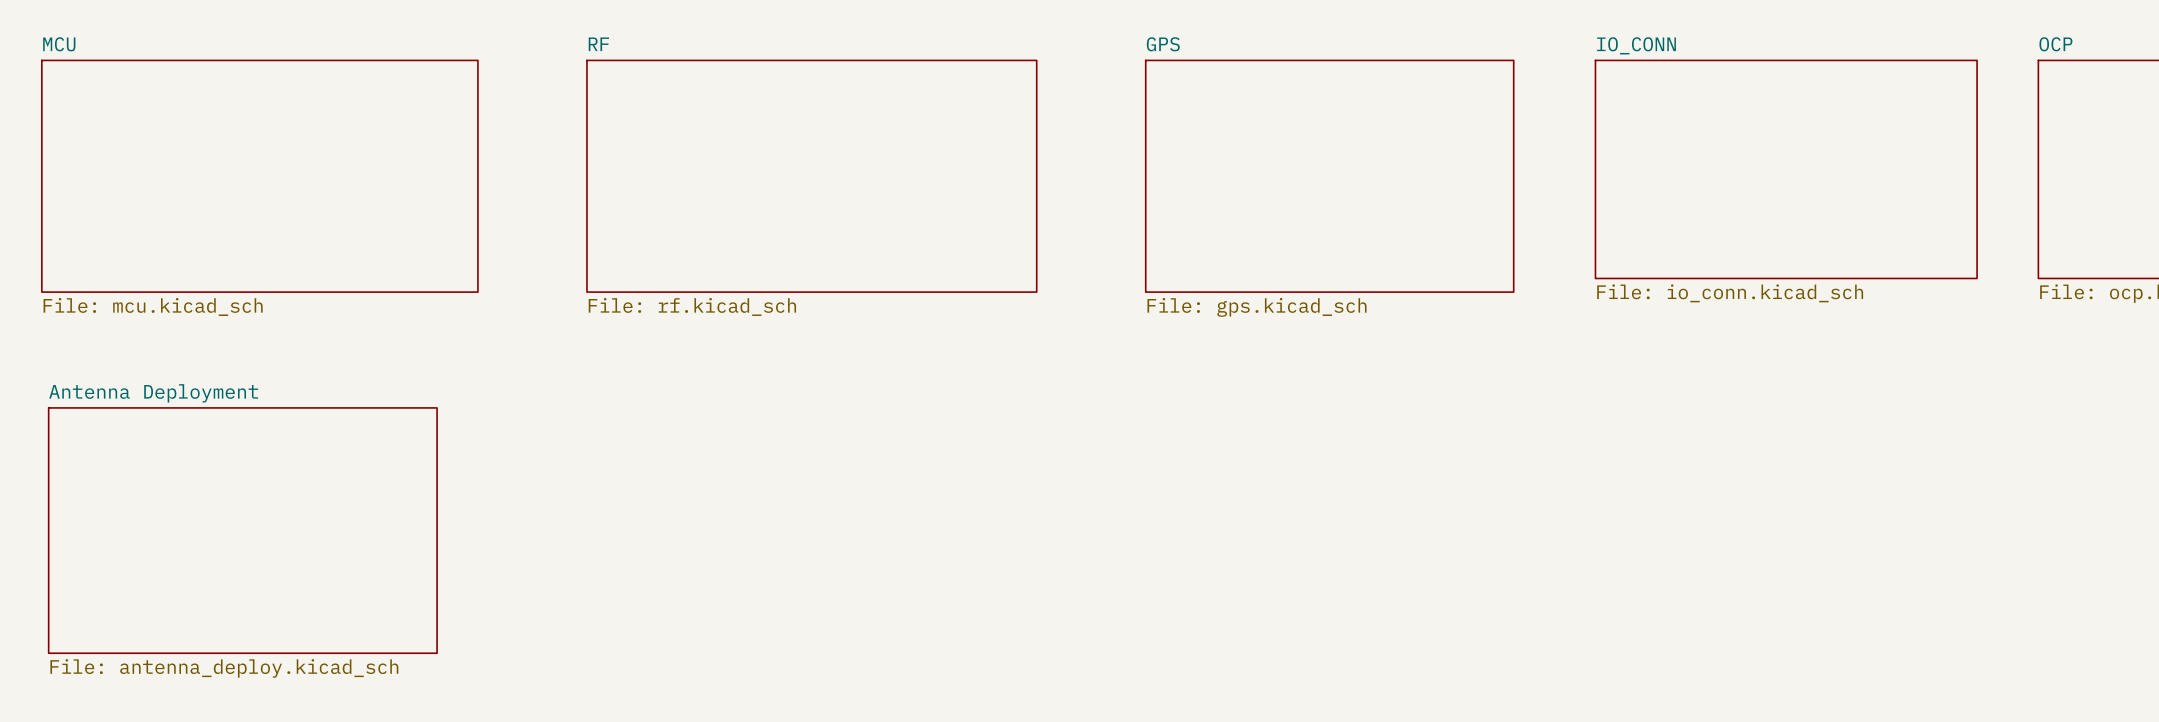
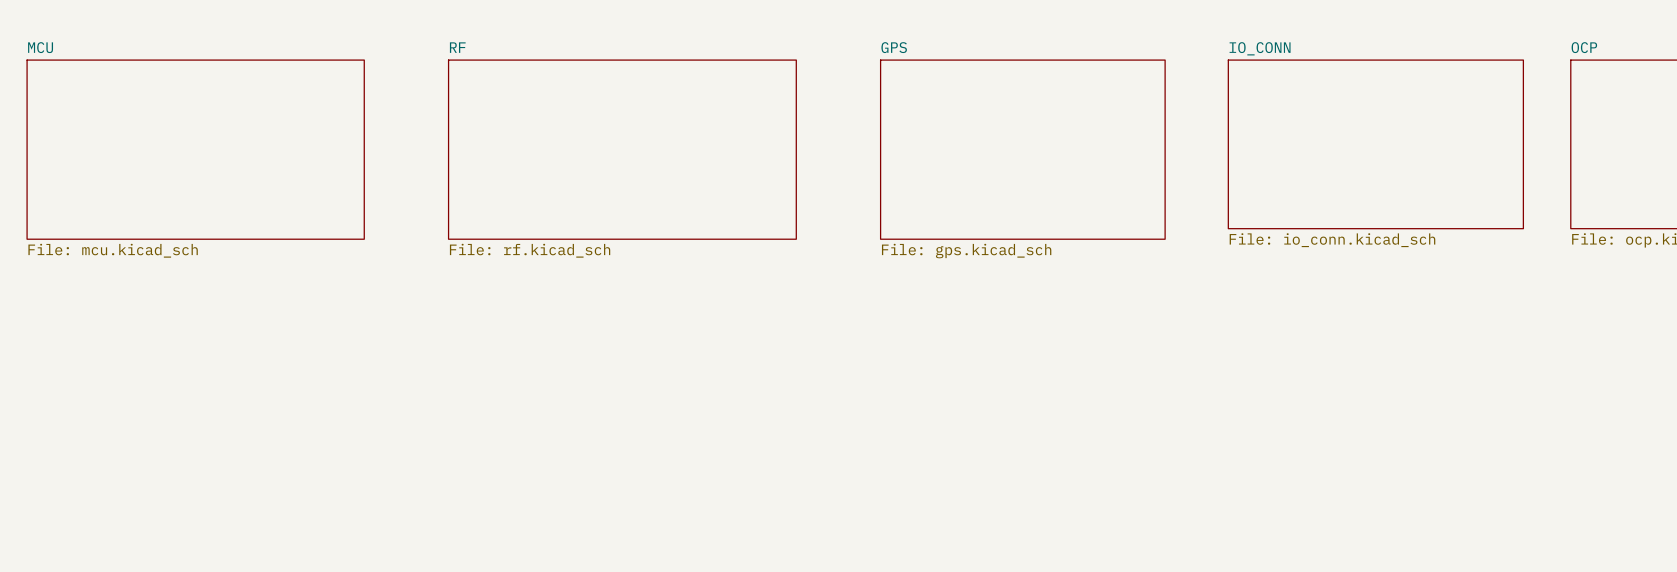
sheet Antenna Deployment: File: antenna_deploy.kicad_sch (242, 530) -> none

